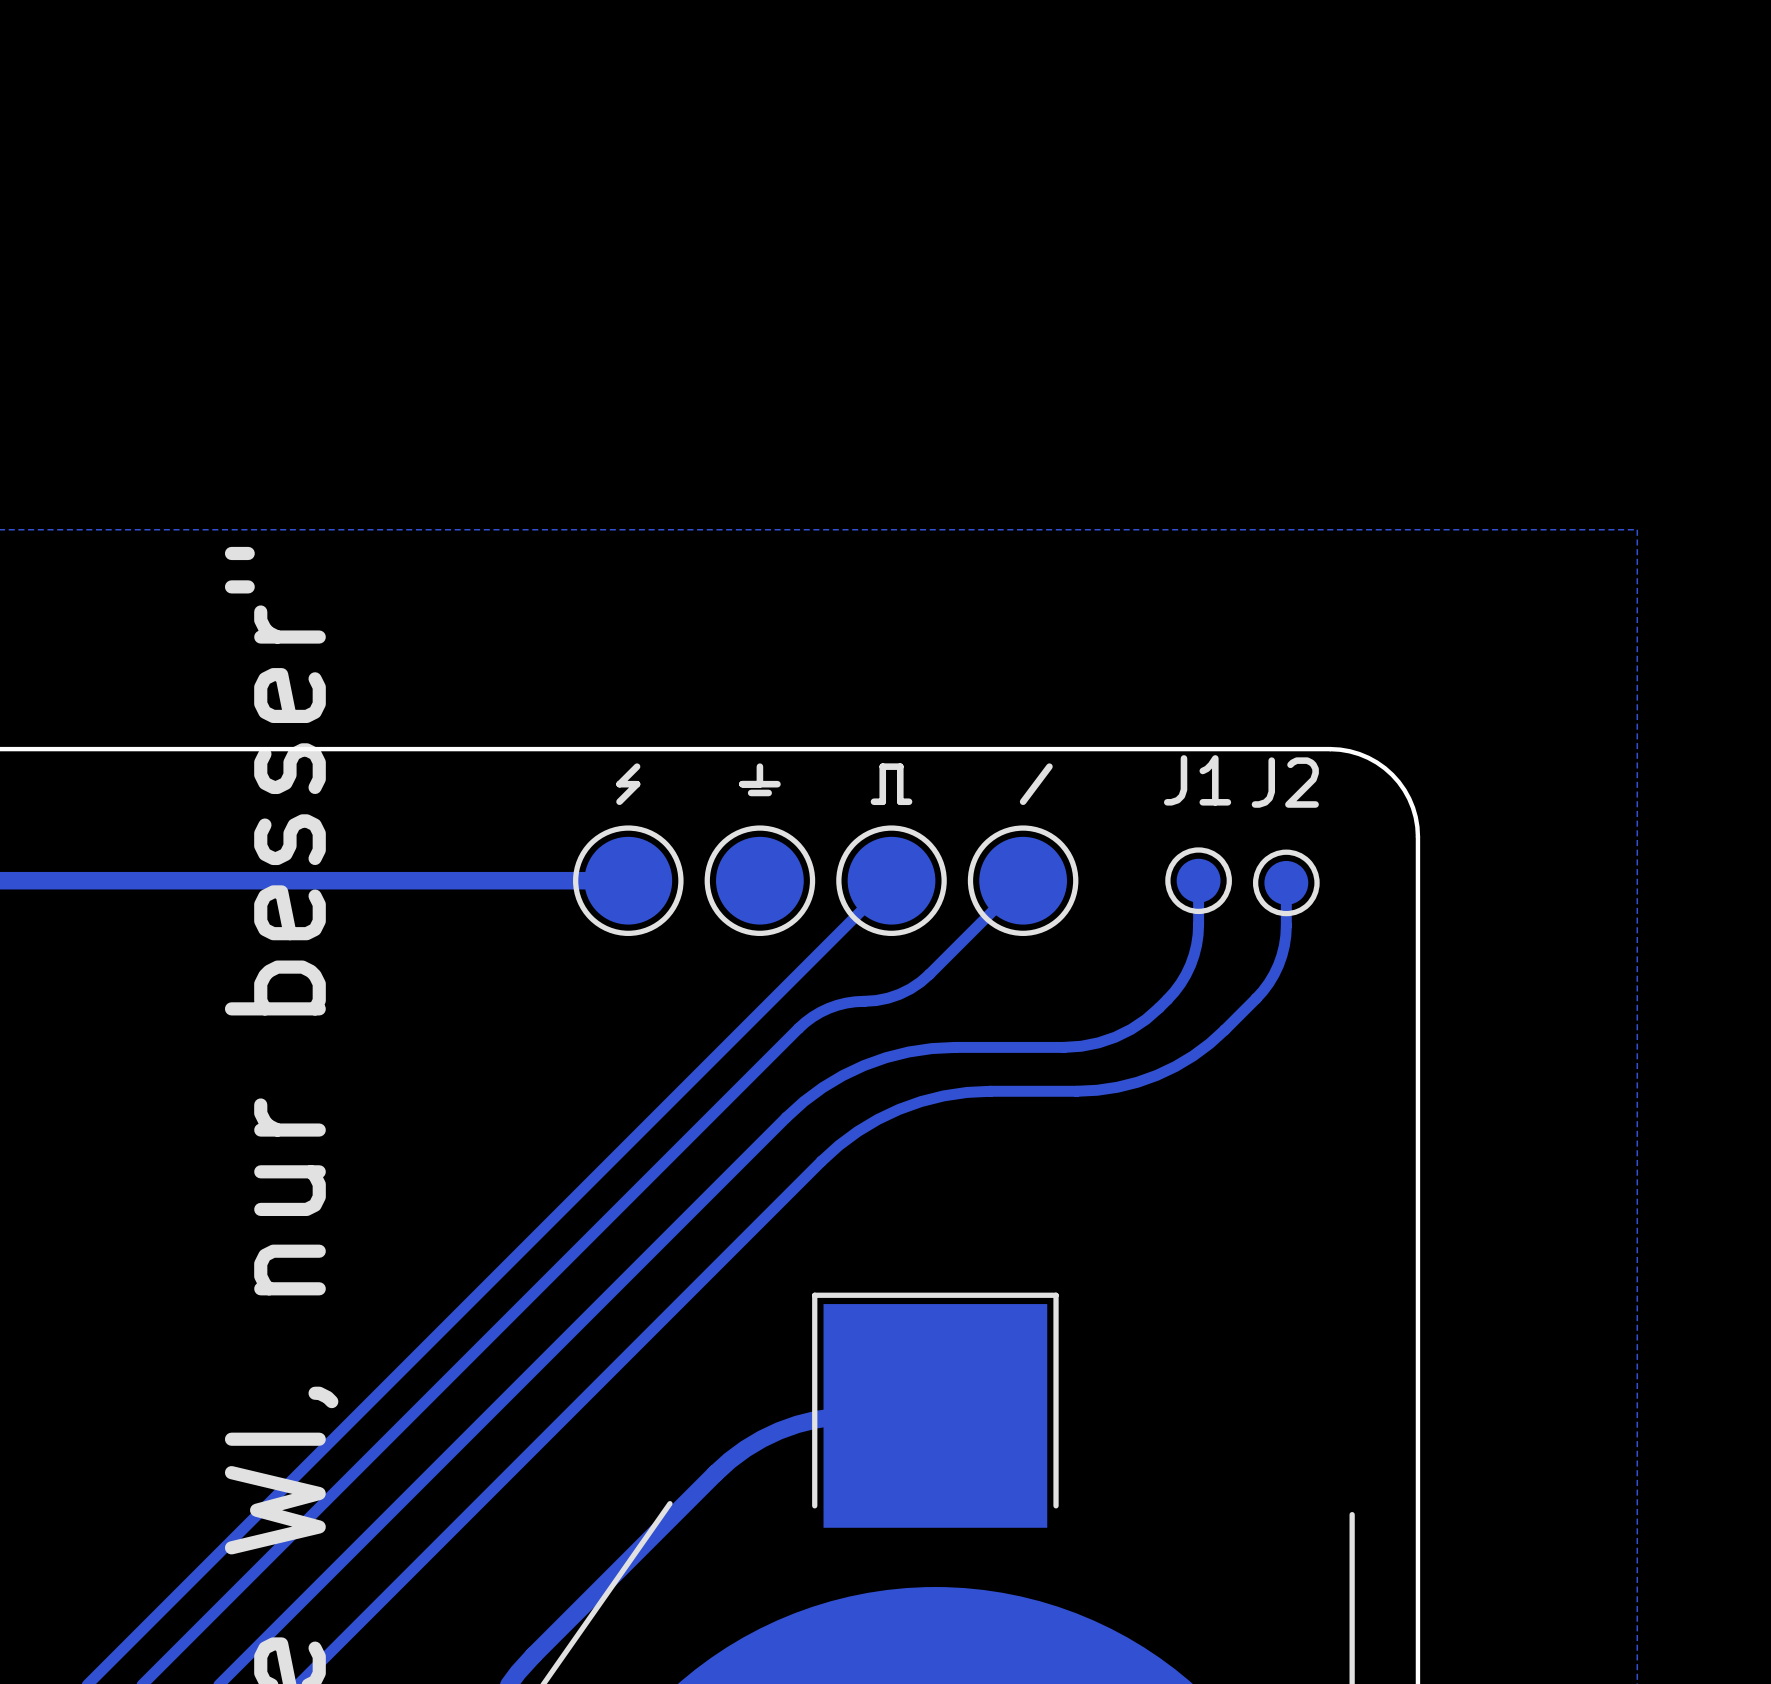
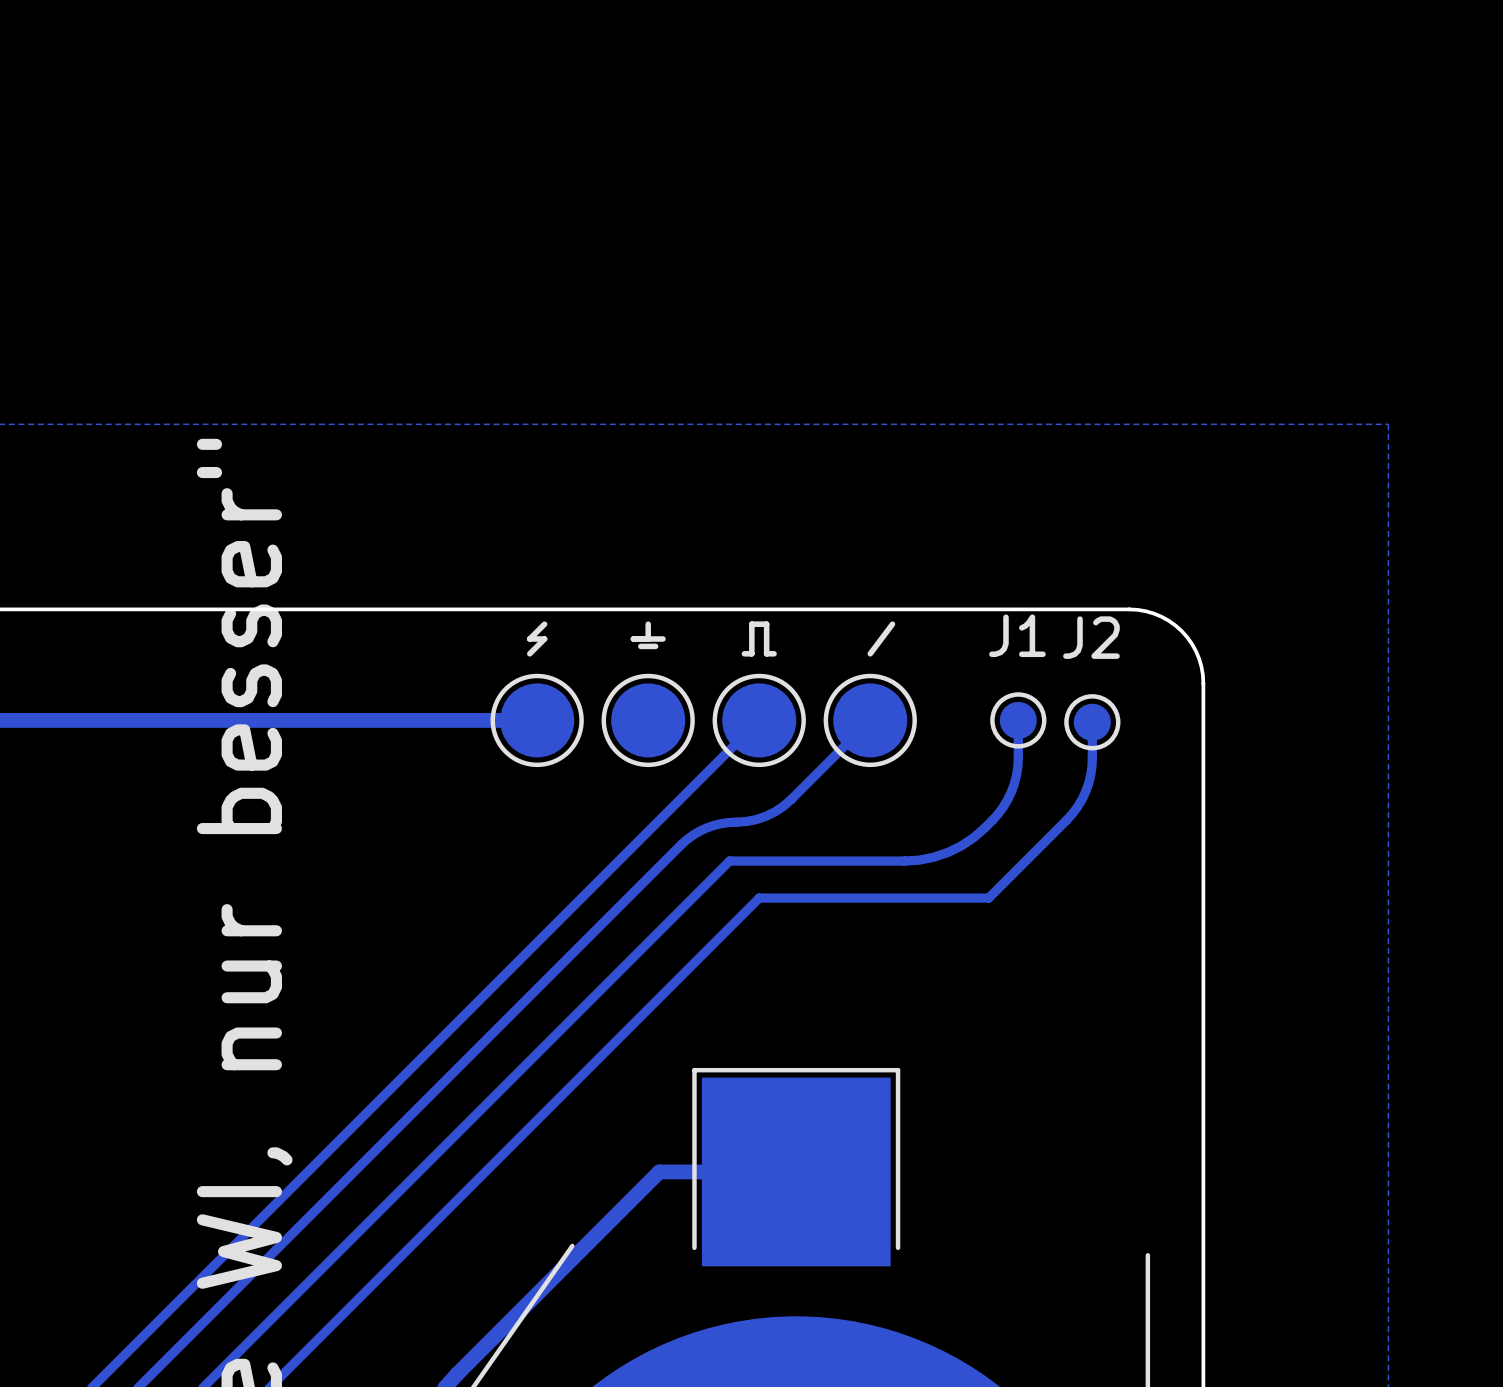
track: (1224, 1029) (1193, 1055) (1156, 1075) (1117, 1087) (1076, 1091) -> (1040, 846) (988, 898) (915, 898)
track: (955, 1047) (908, 1052) (863, 1065) (822, 1087) (786, 1117) -> (813, 861) (729, 861) (670, 920)
track: (990, 1091) (943, 1095) (899, 1109) (857, 1131) (821, 1161) -> (842, 898) (759, 898) (700, 957)
track: (854, 1415) (816, 1419) (779, 1430) (745, 1448) (715, 1473) -> (727, 1171) (659, 1171) (610, 1220)

